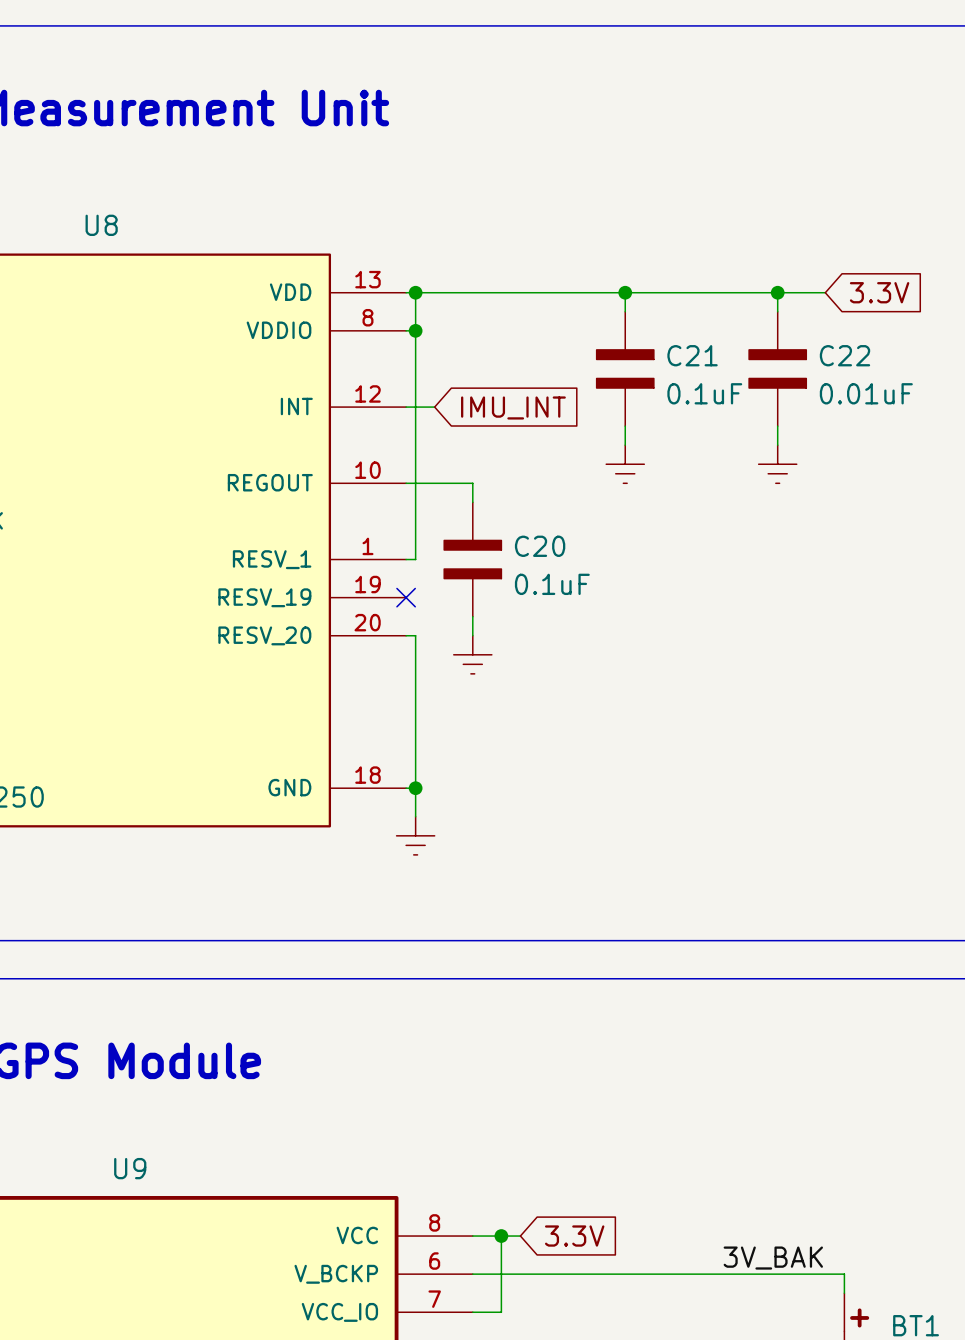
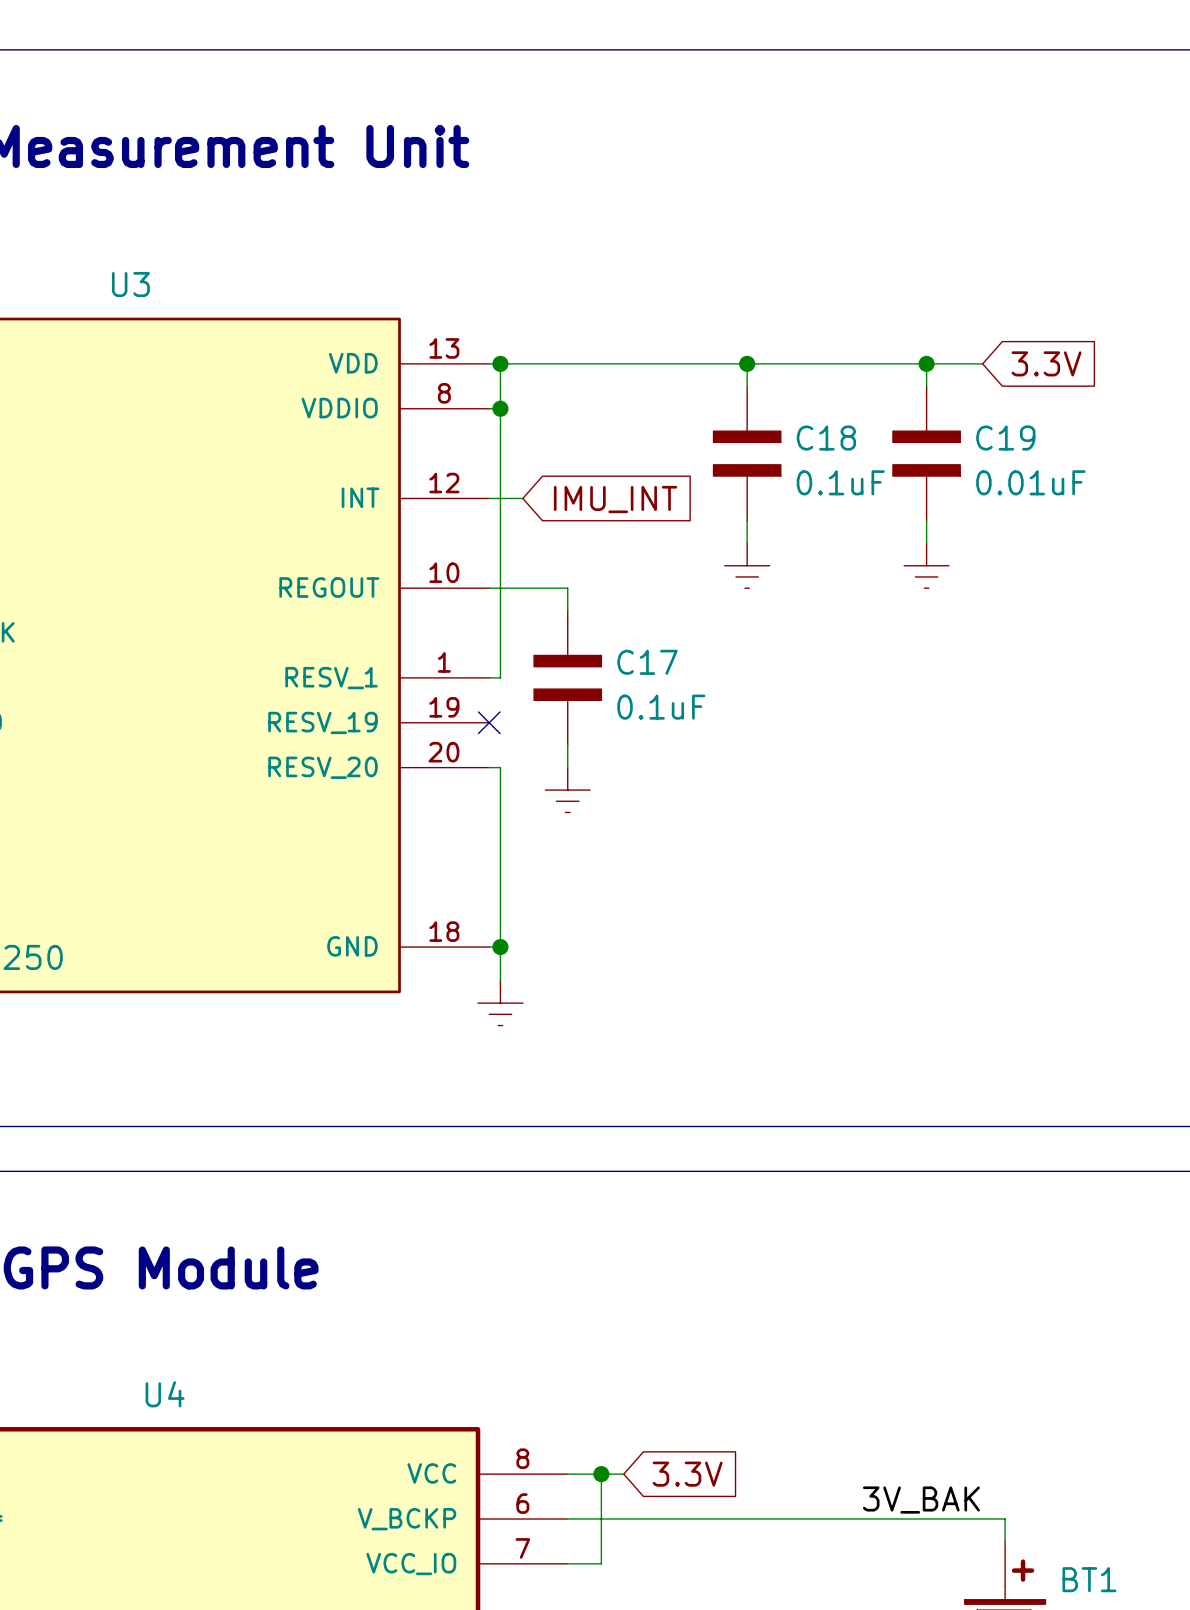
U8 name: U8 (101, 225) -> U3 (130, 284)
C21 name: C21 (692, 355) -> C18 (826, 438)
C22 name: C22 (844, 355) -> C19 (1005, 438)
C20 name: C20 (540, 546) -> C17 (647, 662)
U9 name: U9 (130, 1168) -> U4 (165, 1394)

